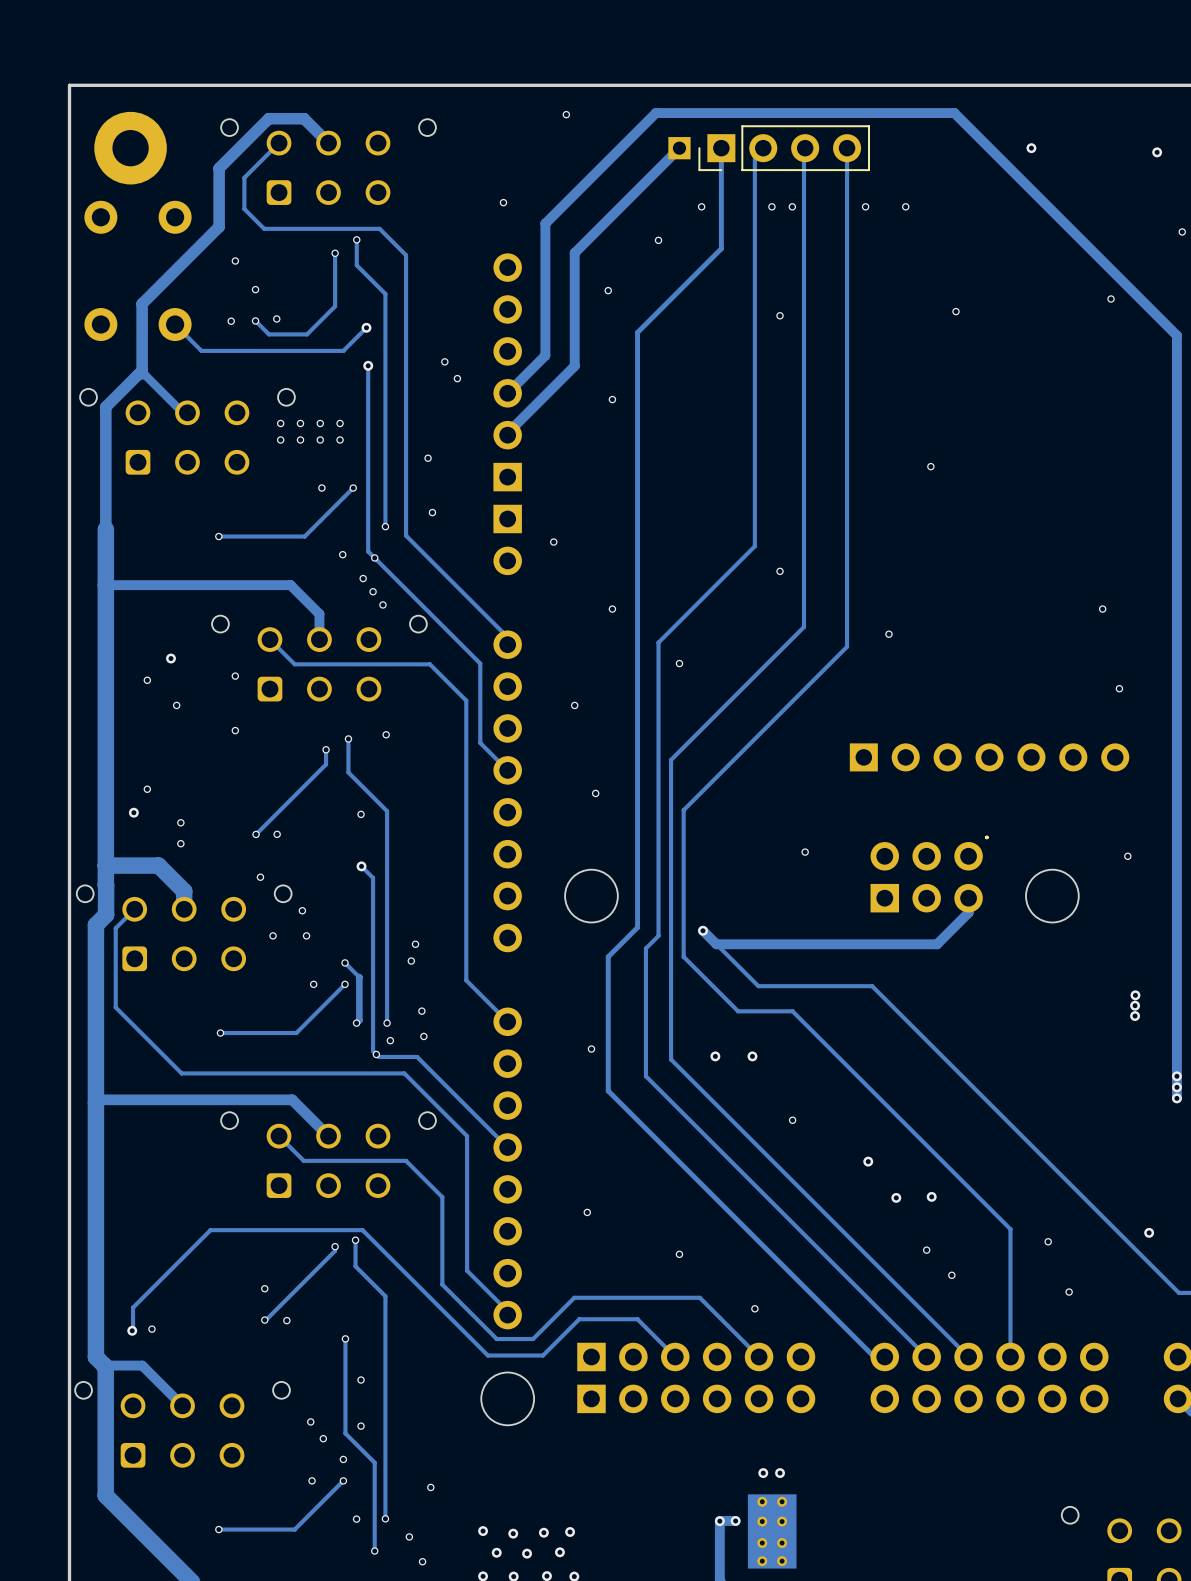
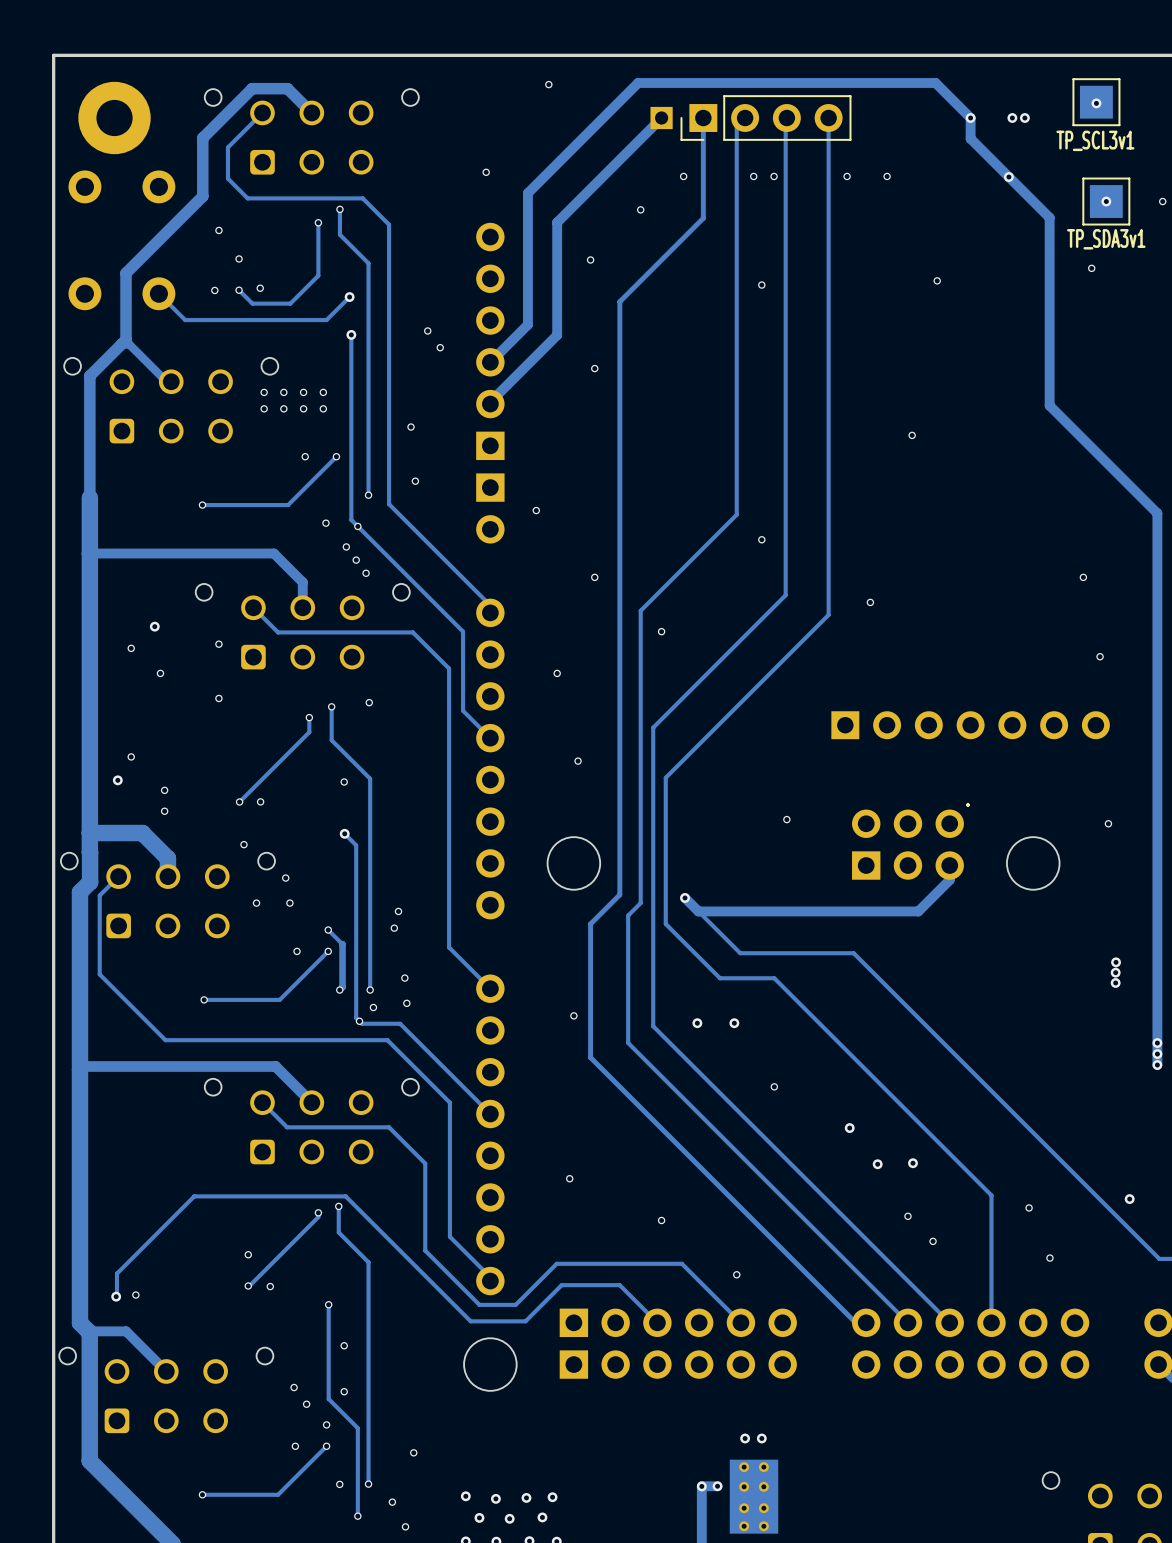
TP_SCL3v1: none -> (1096, 102)
via: none -> (1096, 103)
track: (989, 148) (1176, 335) (1176, 544) -> (970, 118) (970, 138) (1049, 217) (1049, 405) (1157, 513)
via: none -> (970, 118)
via: none -> (1024, 118)
via: (1157, 152) -> none
via: none -> (1008, 177)
via: none -> (1106, 201)
TP_SDA3v1: none -> (1106, 201)

